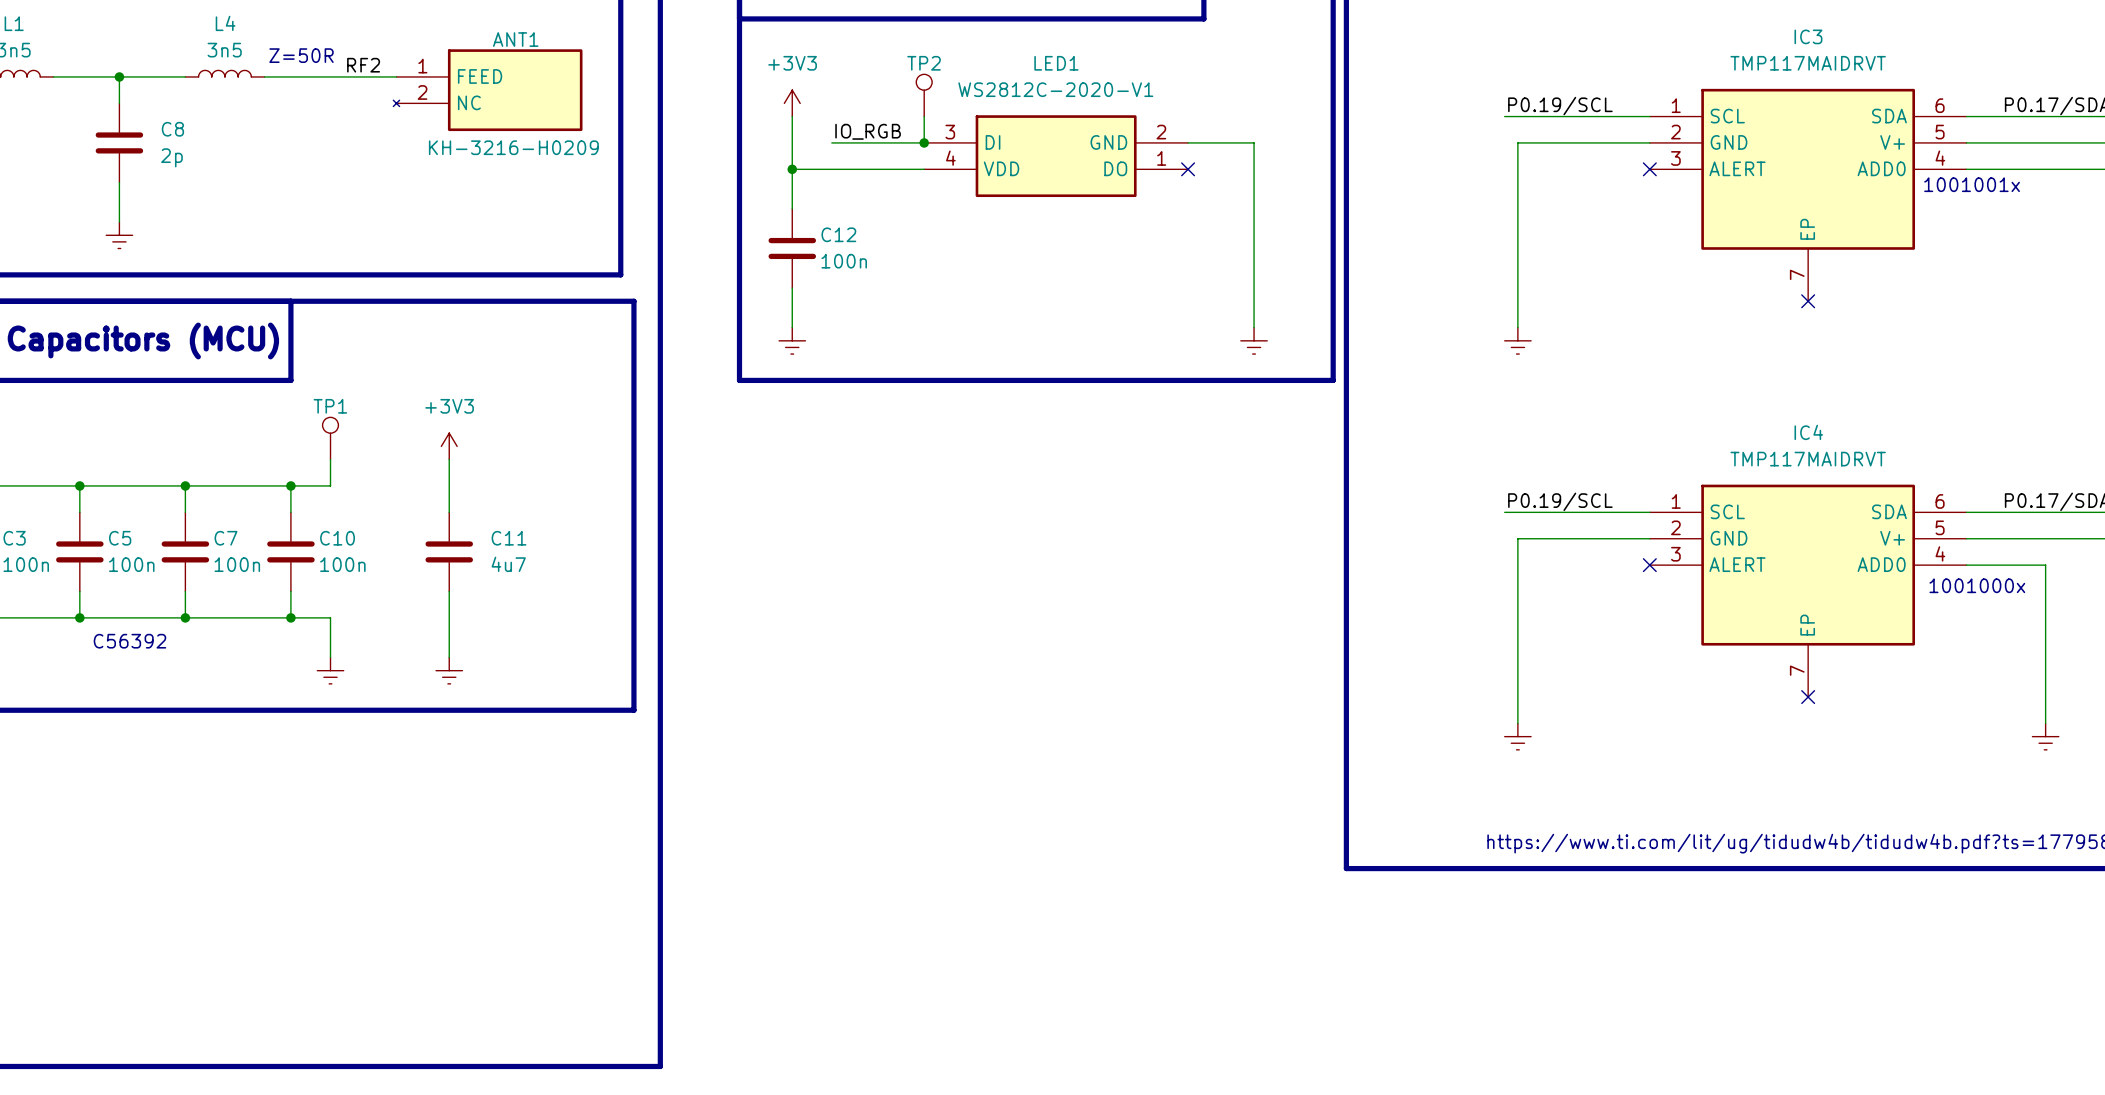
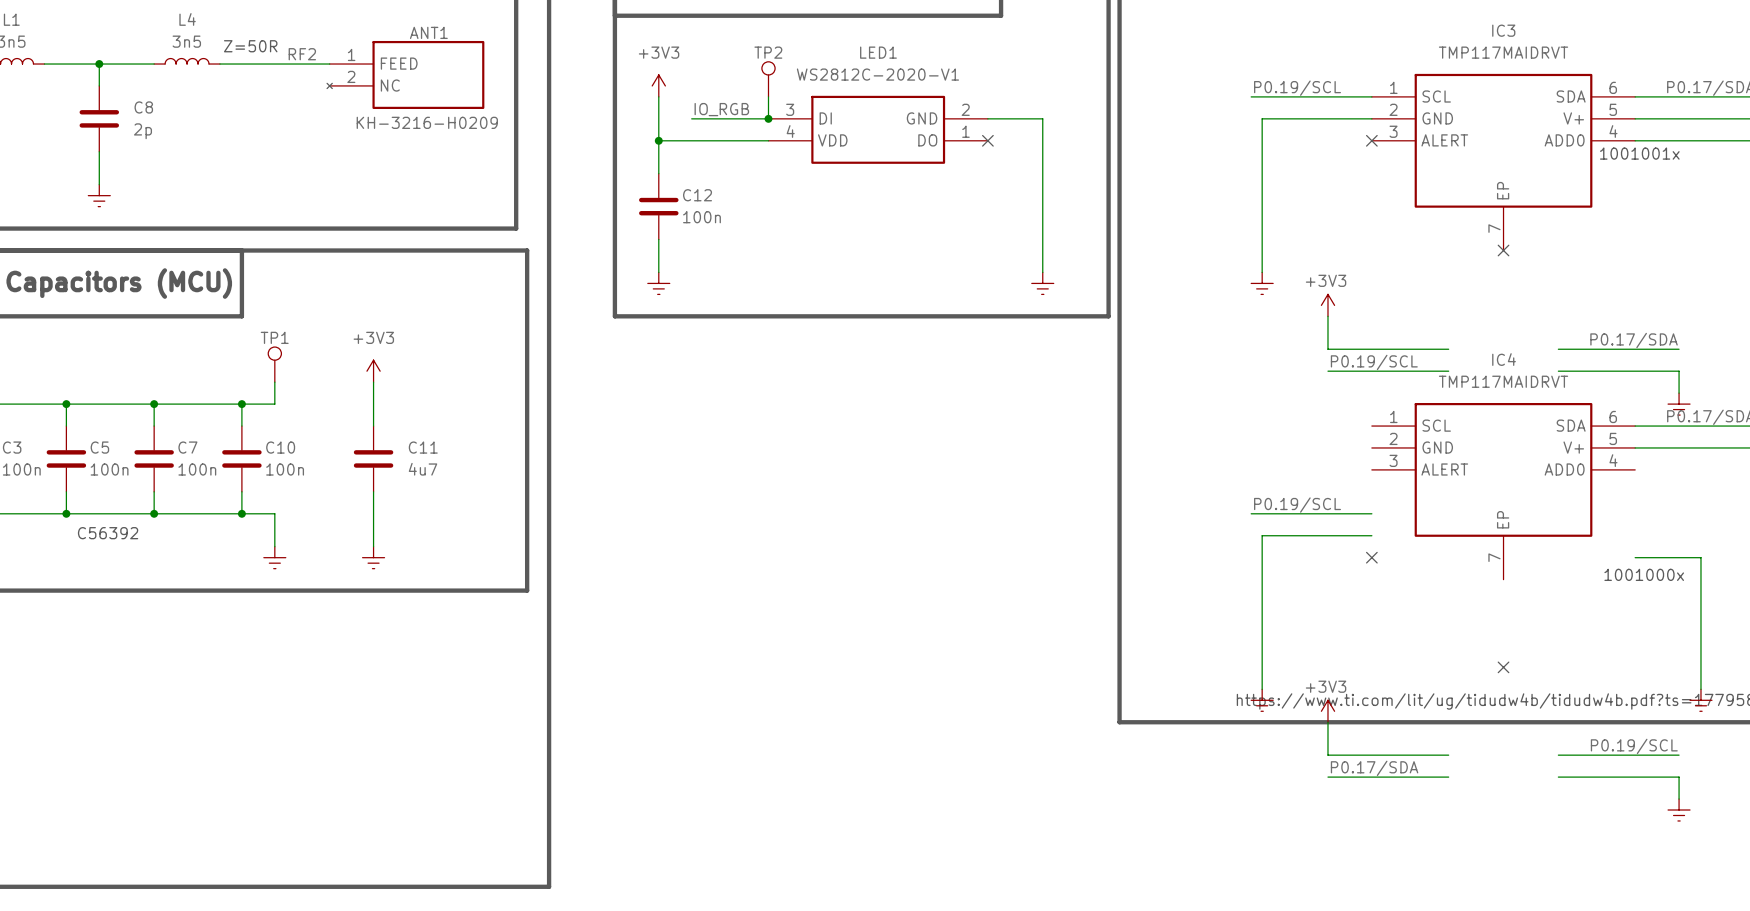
power symbol: none -> +3V3 (1327, 305)
wire: none -> (1327, 316) (1327, 349) (1448, 349)
label: none -> P0.17/SDA (1634, 340)
wire: none -> (1558, 349) (1679, 349)
label: none -> P0.19/SCL (1374, 362)
wire: none -> (1327, 371) (1448, 371)
wire: none -> (1558, 371) (1679, 371) (1679, 393)
power symbol: none -> (1679, 404)
label: P0.19/SCL (1560, 501) -> none
wire: (1504, 512) (1649, 512) -> (1251, 513) (1371, 513)
wire: (1649, 538) (1517, 538) (1517, 644) -> (1371, 535) (1262, 535)
no-connect mark: (1649, 565) -> none
wire: (1966, 565) (2045, 565) (2045, 670) -> (1635, 557) (1700, 557)
text position: 1001000x (1977, 585) -> 1001000x (1644, 574)
label: none -> P0.19/SCL (1297, 505)
no-connect mark: none -> (1371, 557)
no-connect mark: (1808, 697) -> none
wire: none -> (1262, 601) (1262, 689)
wire: none -> (1700, 601) (1700, 689)
power symbol position: (1517, 736) -> (1262, 700)
power symbol: (2045, 736) -> none
no-connect mark: none -> (1503, 667)
power symbol: none -> (1700, 700)
power symbol: none -> +3V3 (1327, 711)
wire: none -> (1327, 722) (1327, 755) (1448, 755)
label: none -> P0.19/SCL (1634, 746)
wire: none -> (1558, 755) (1679, 755)
label: none -> P0.17/SDA (1374, 768)
wire: none -> (1327, 777) (1448, 777)
wire: none -> (1558, 777) (1679, 777) (1679, 799)
power symbol: none -> (1679, 810)

